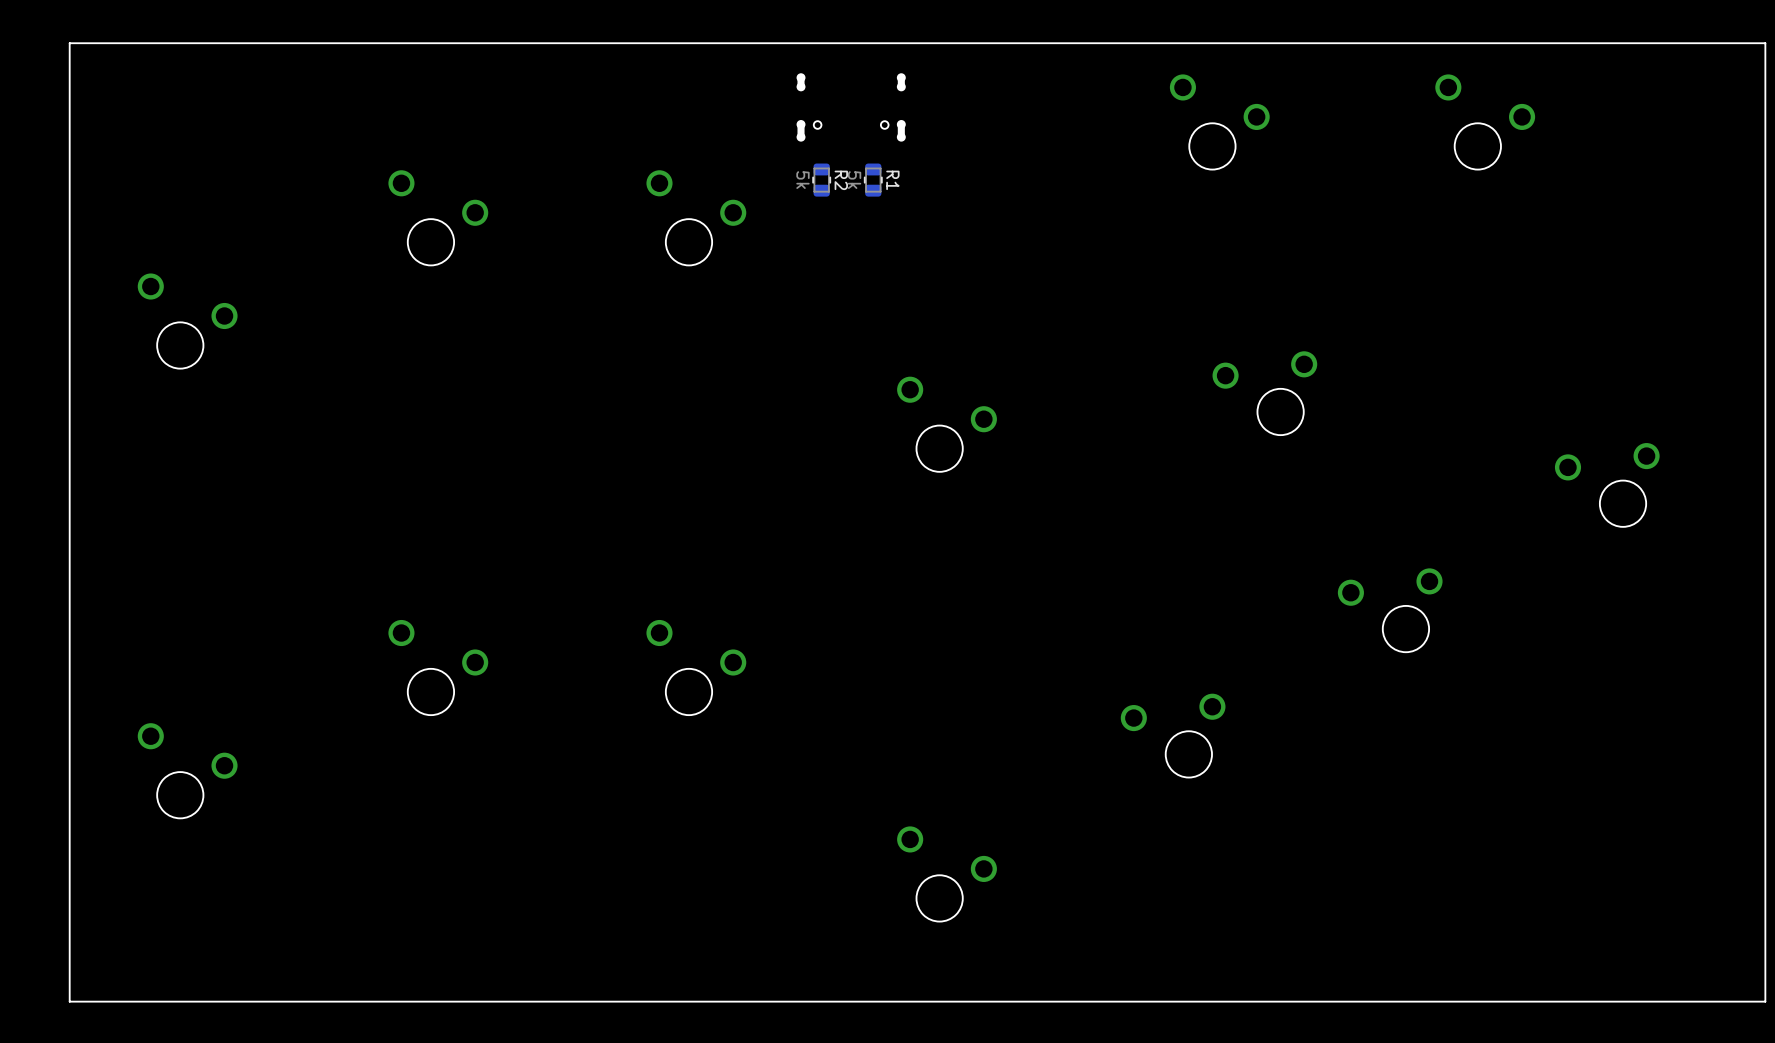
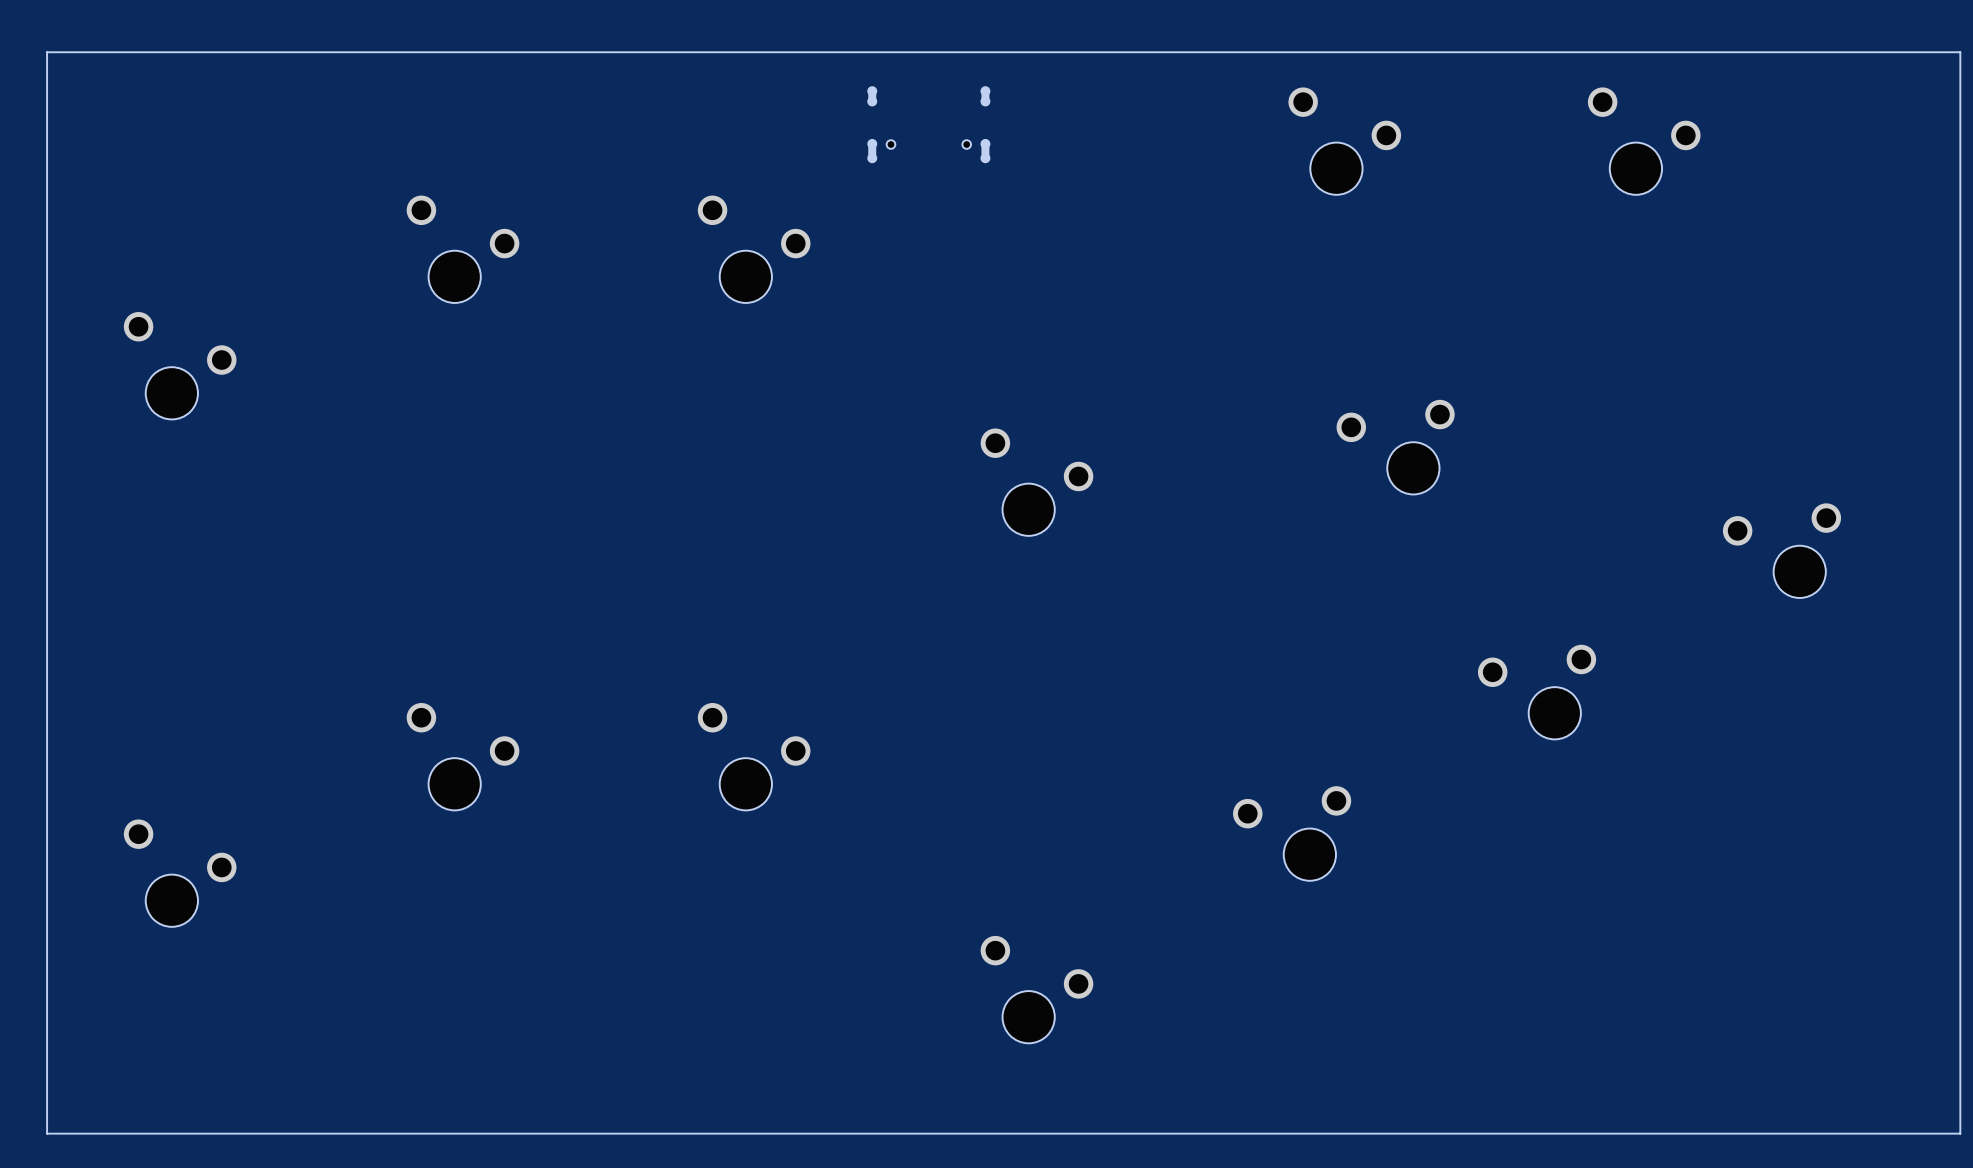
R2: 5k (821, 180) -> none
R1: 5k (873, 180) -> none

